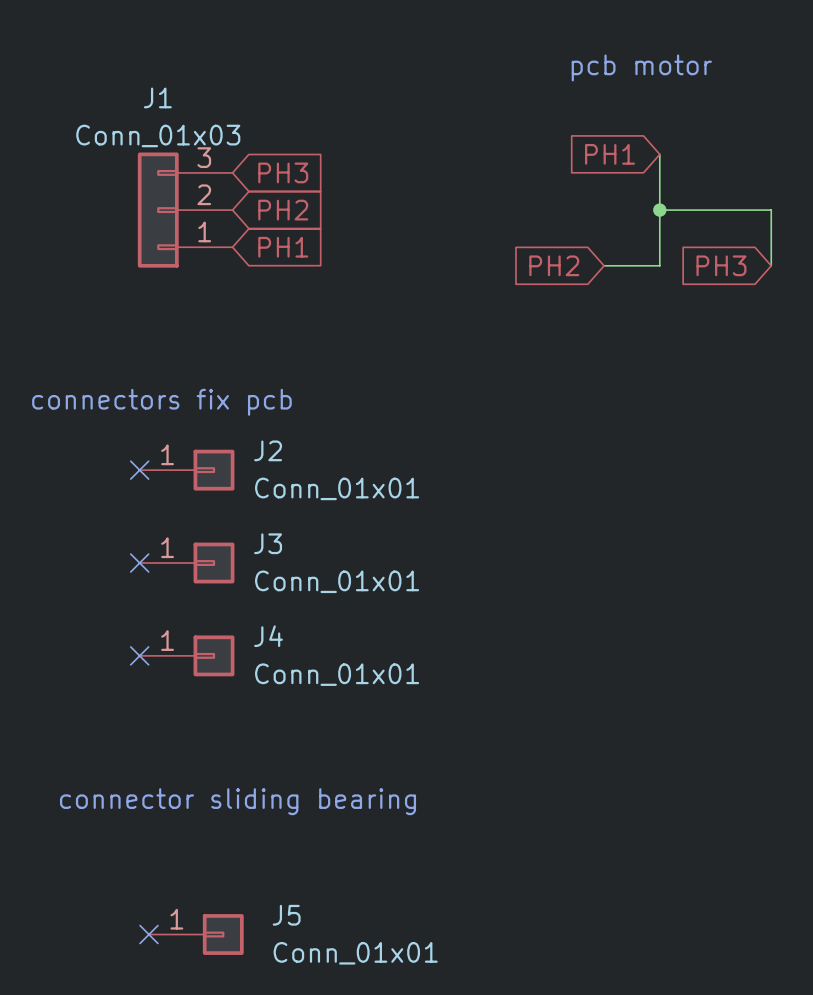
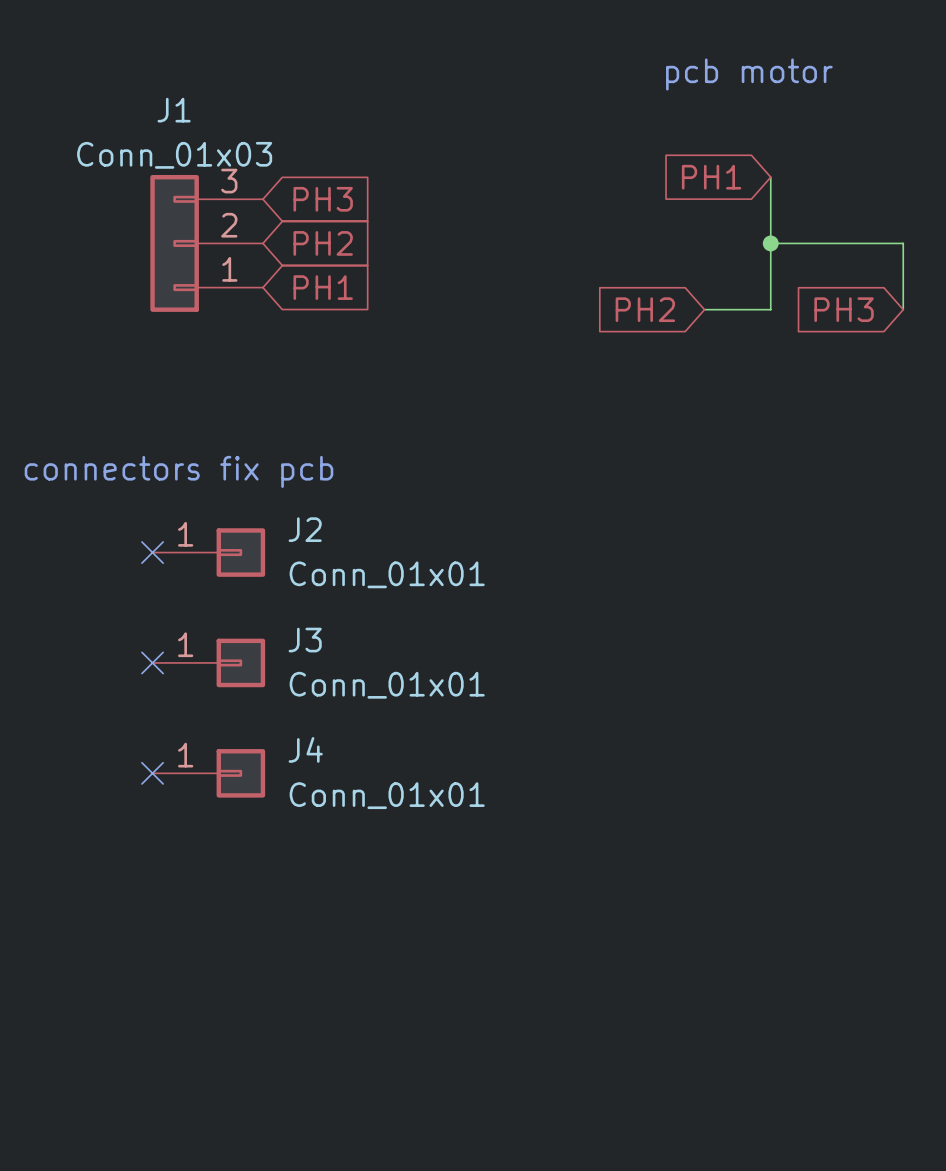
text: connector sliding bearing (238, 801) -> none
no-connect mark: (148, 934) -> none
J5: Conn_01x01 (196, 934) -> none

